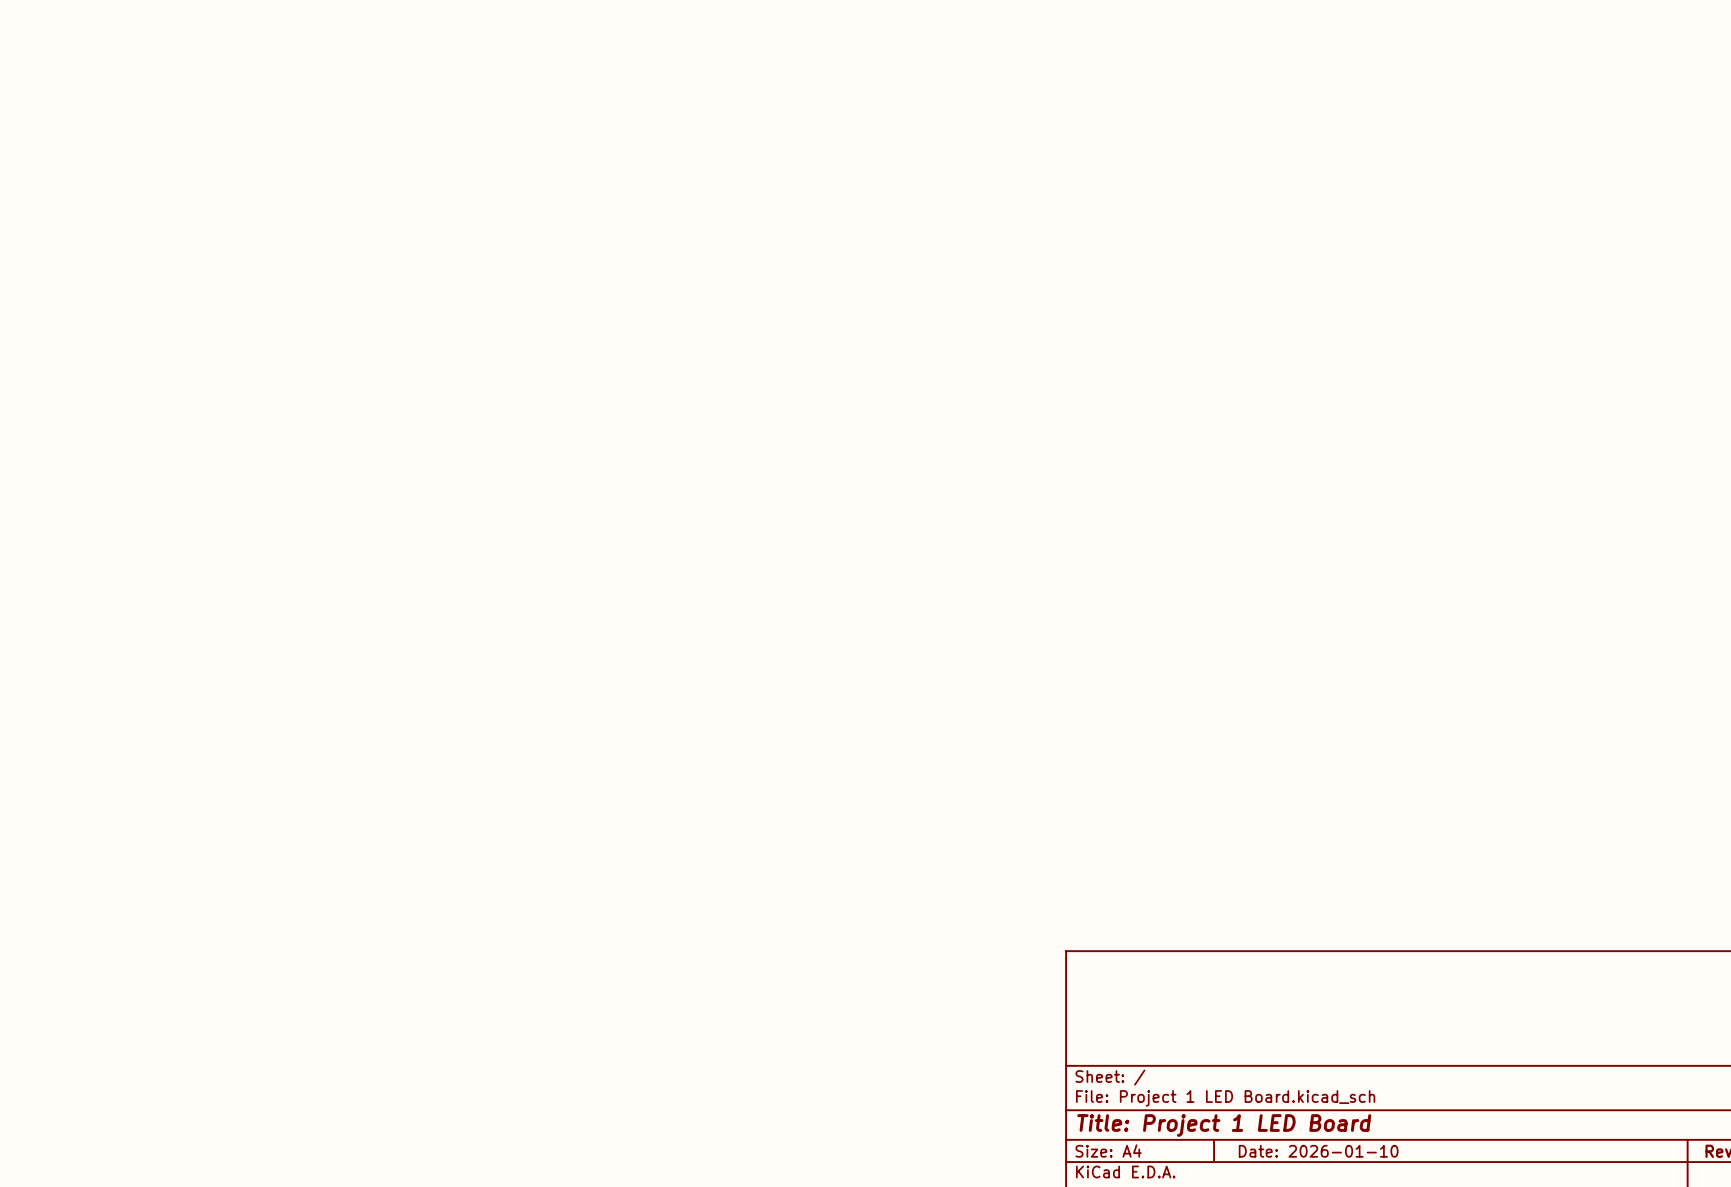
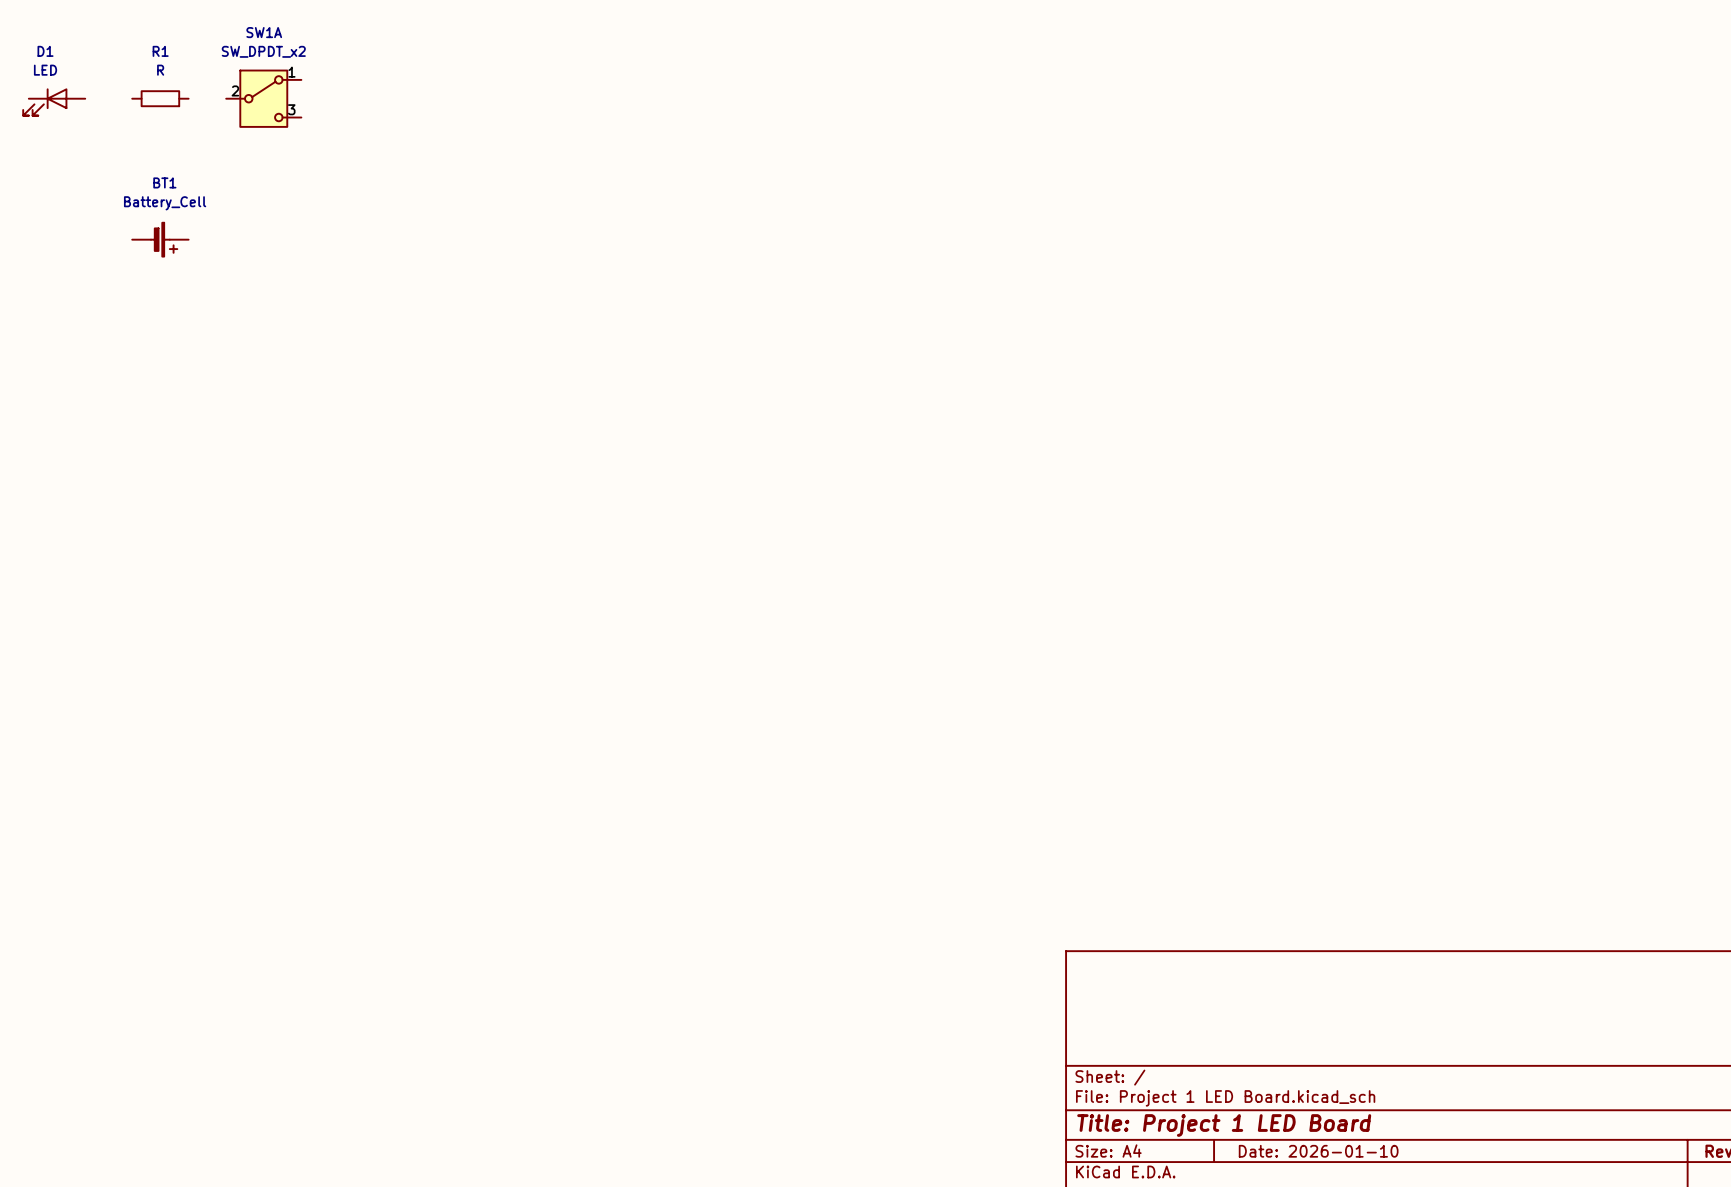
R1: none -> R (160, 98)
SW1A: none -> SW_DPDT_x2 (263, 98)
D1: none -> LED (54, 102)
BT1: none -> Battery_Cell (160, 239)

